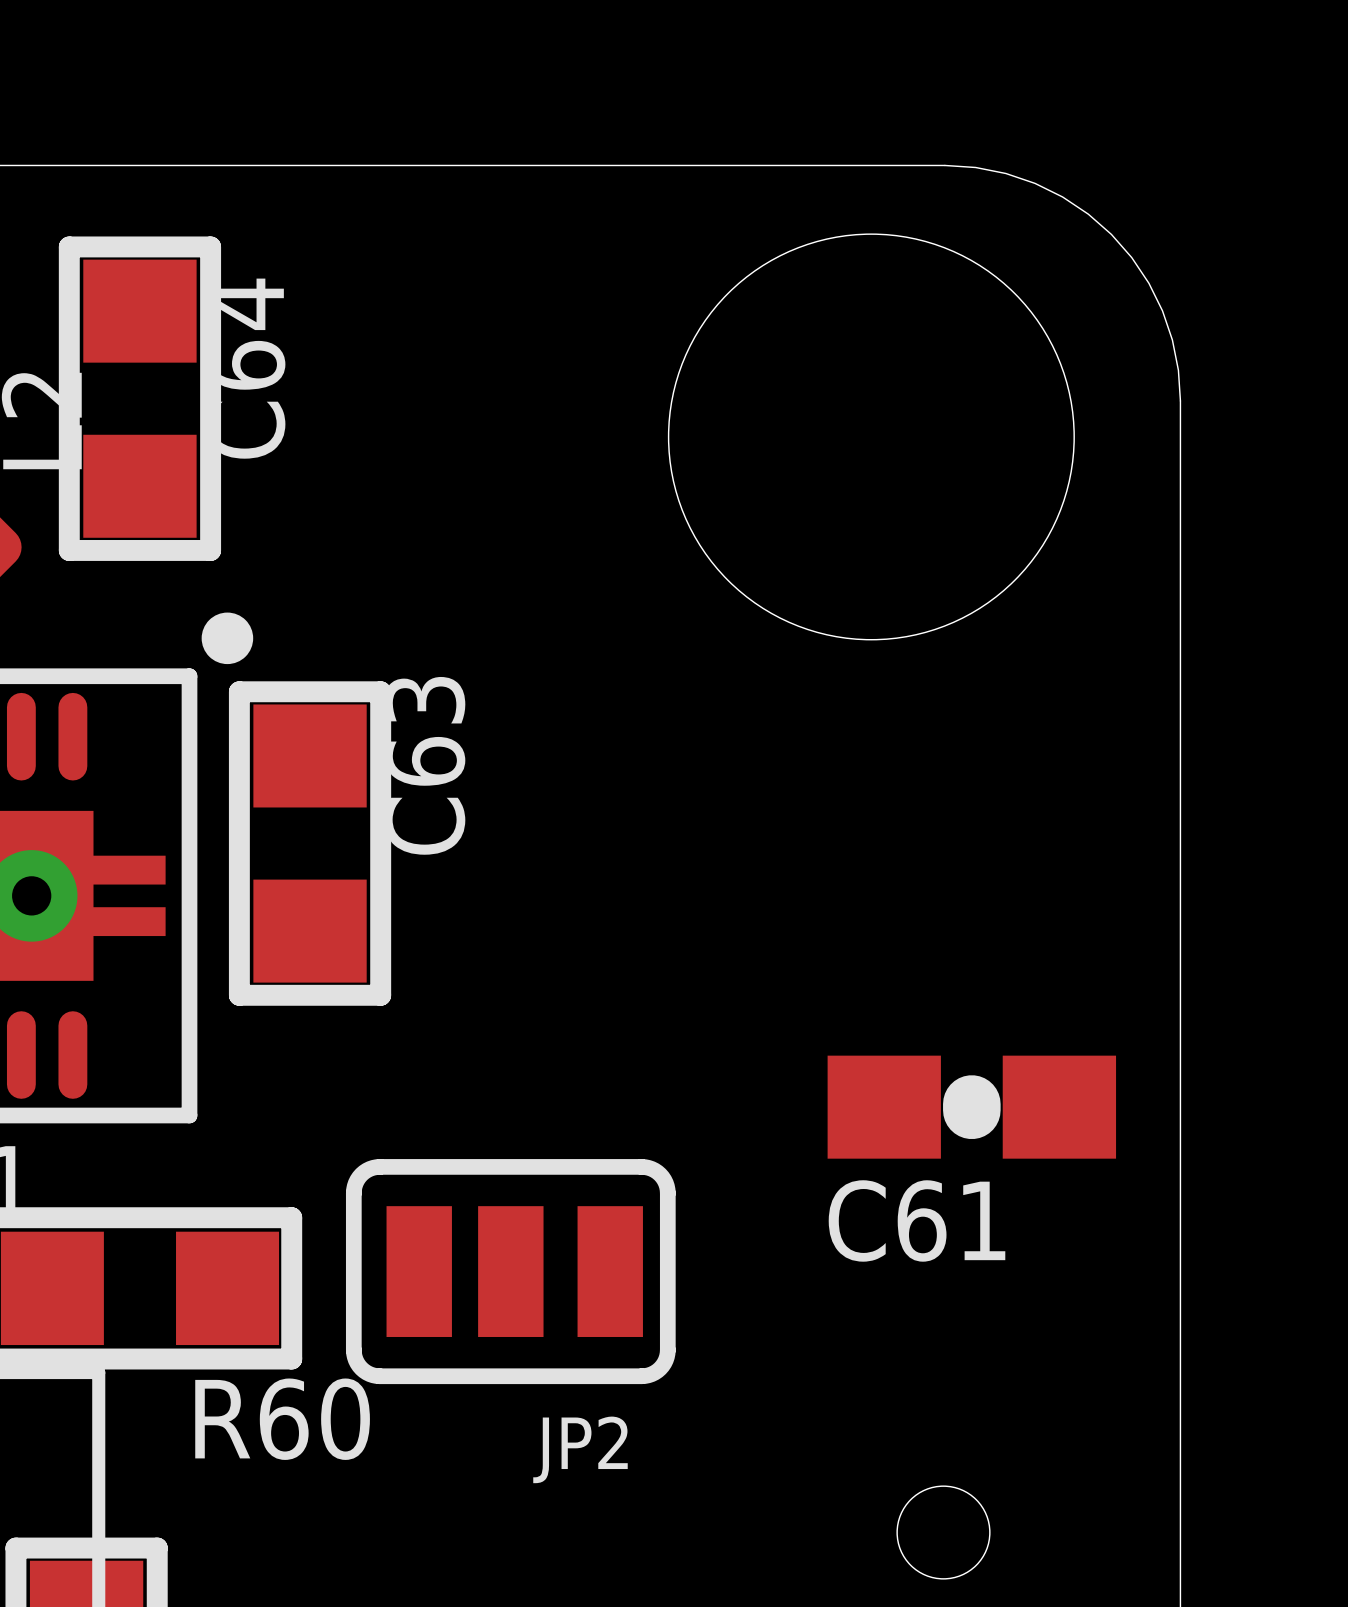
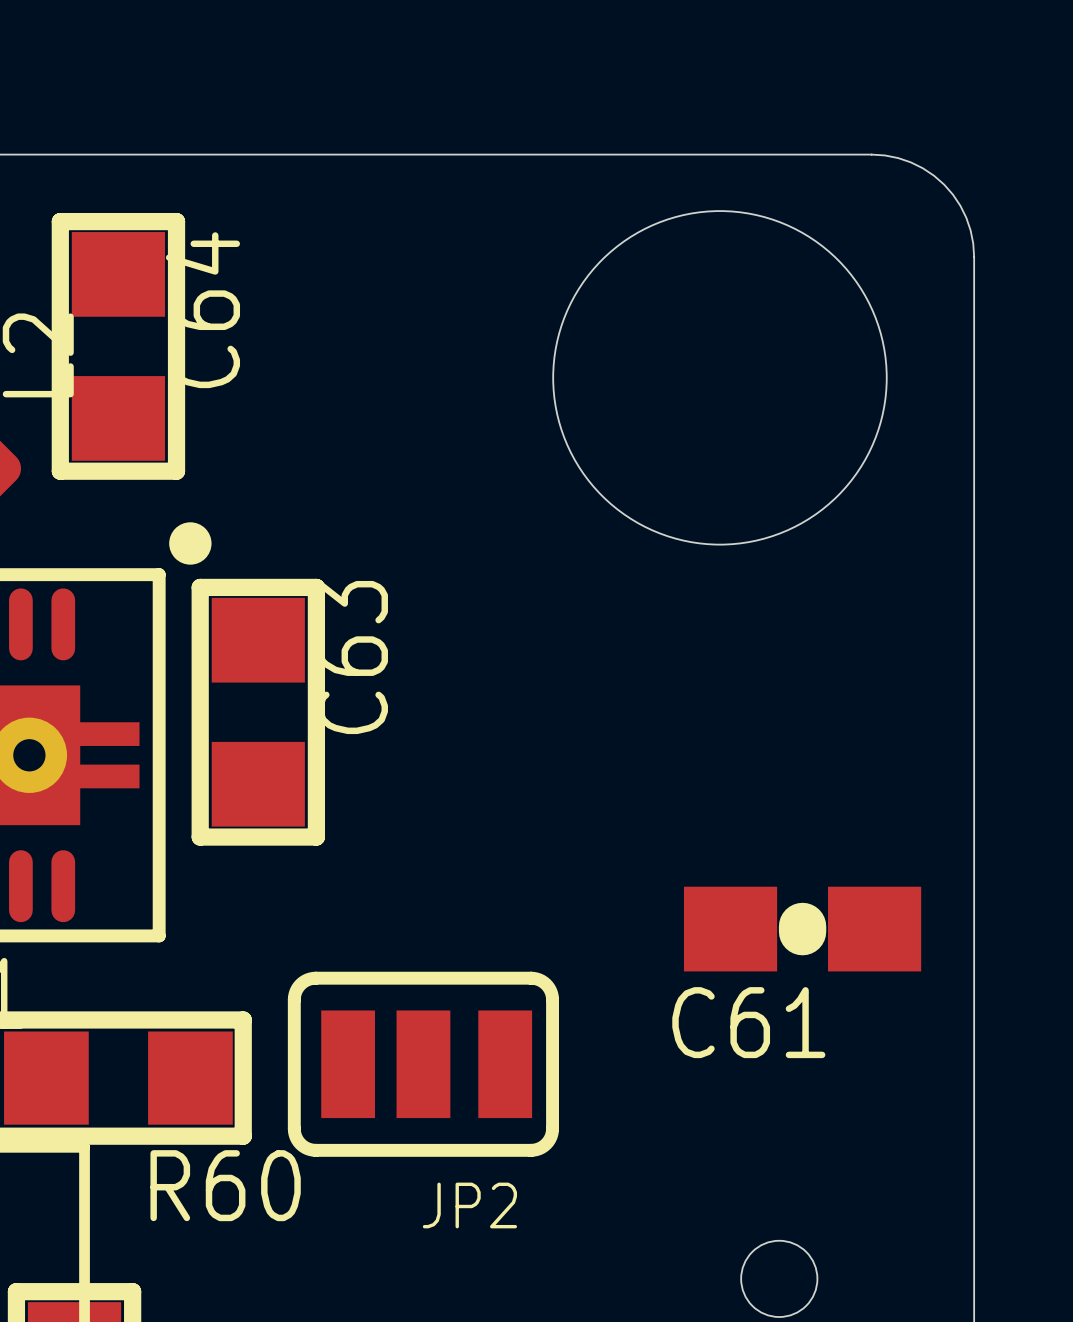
board edge: (944, 165) (975, 167) (1005, 173) (1035, 183) (1062, 197) (1088, 214) (1111, 234) (1131, 257) (1148, 283) (1162, 310) (1172, 340) (1178, 370) (1180, 400) -> (780, 154) (885, 155) (910, 162) (934, 175) (944, 184) (952, 194) (966, 217) (973, 243) (974, 348)

